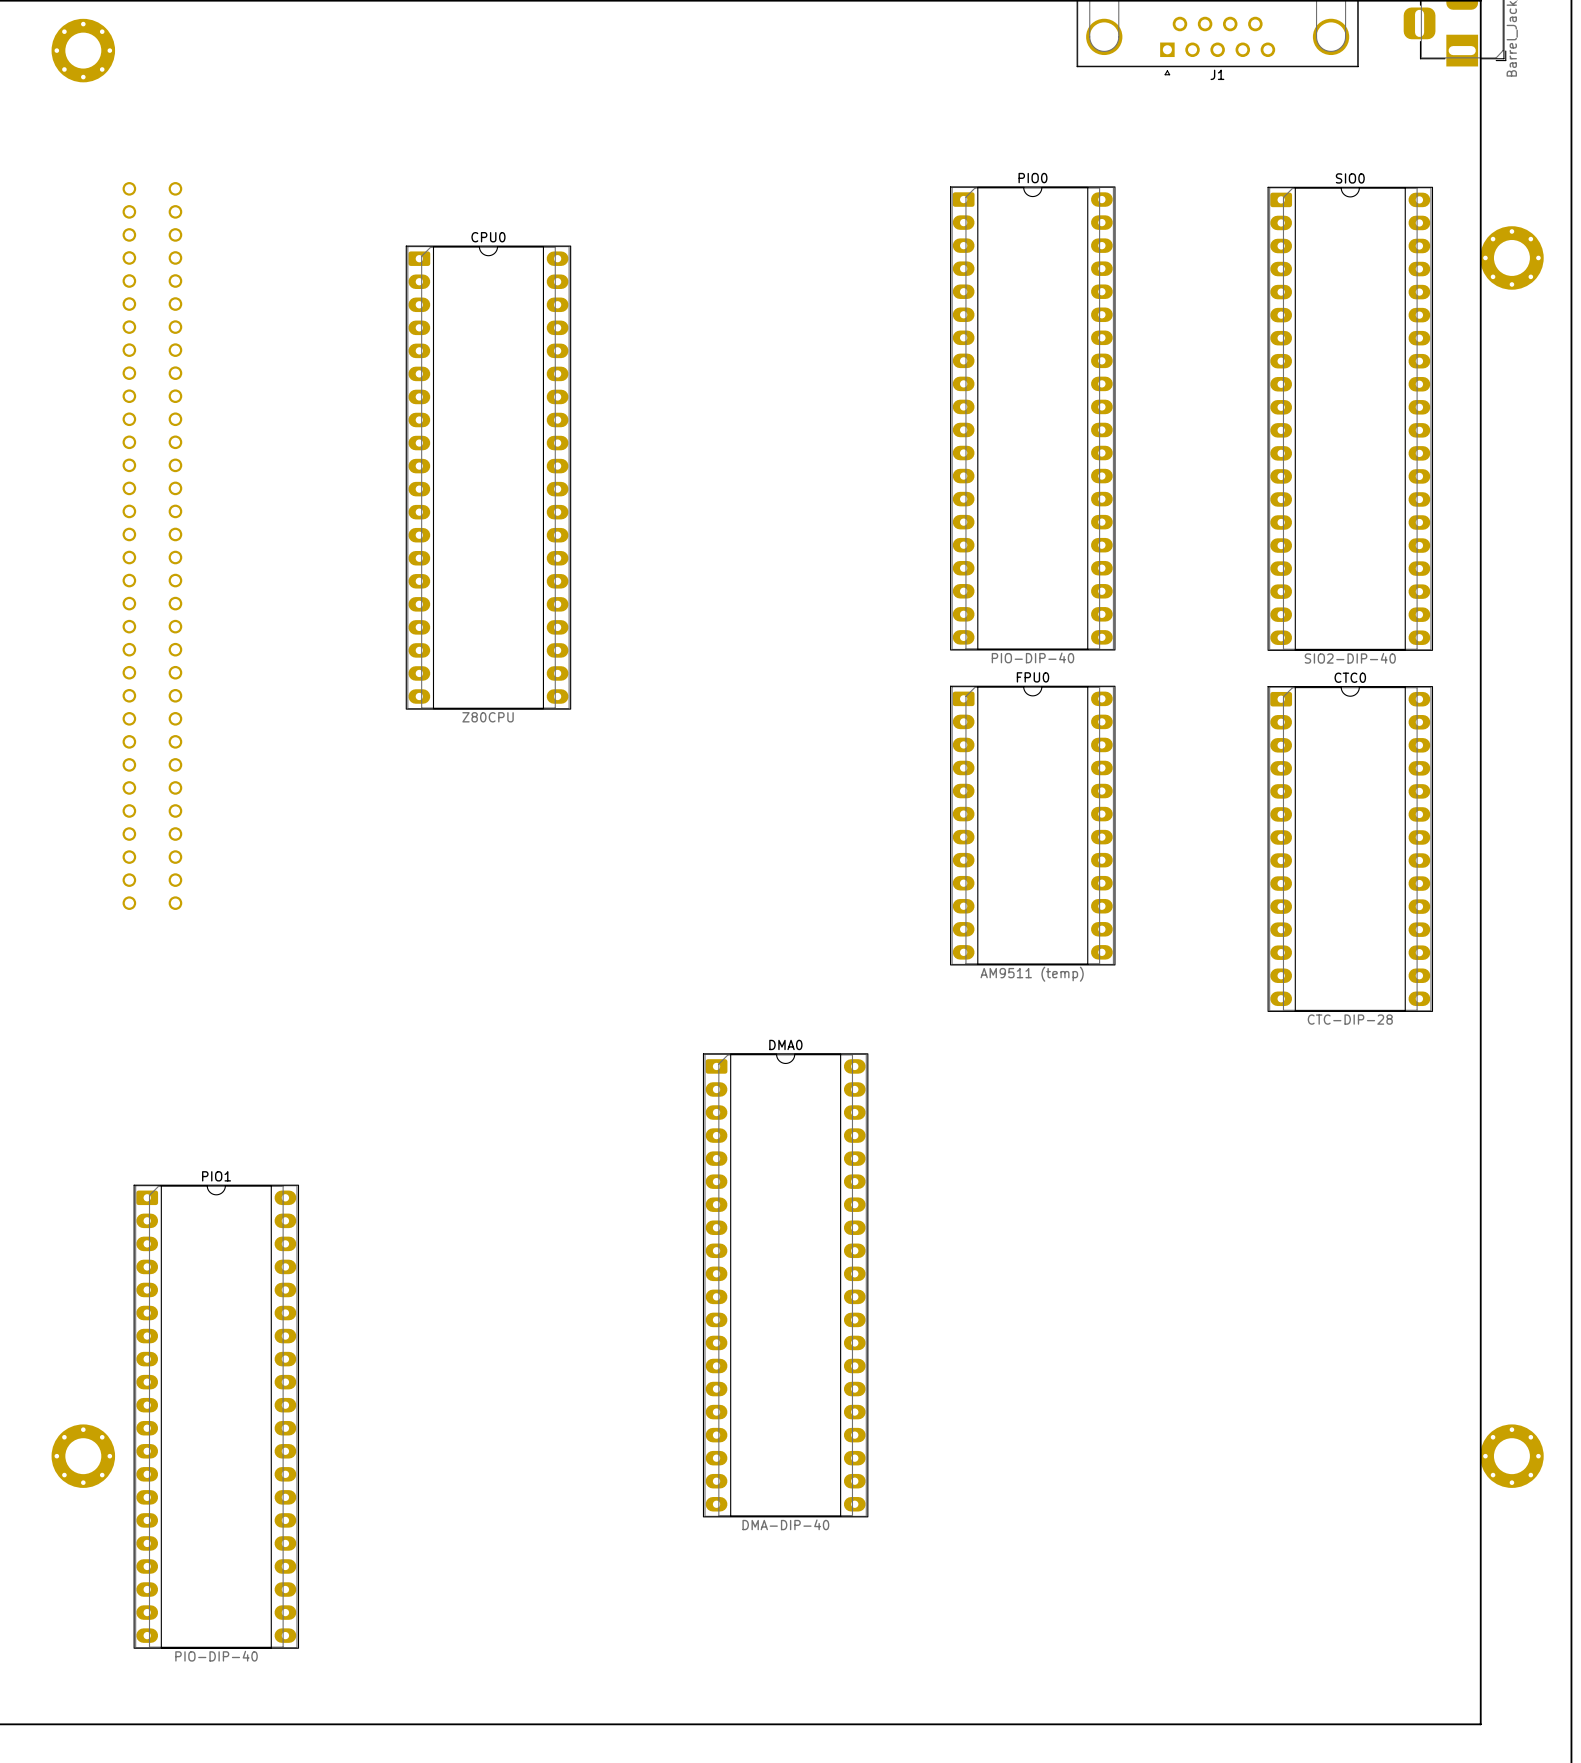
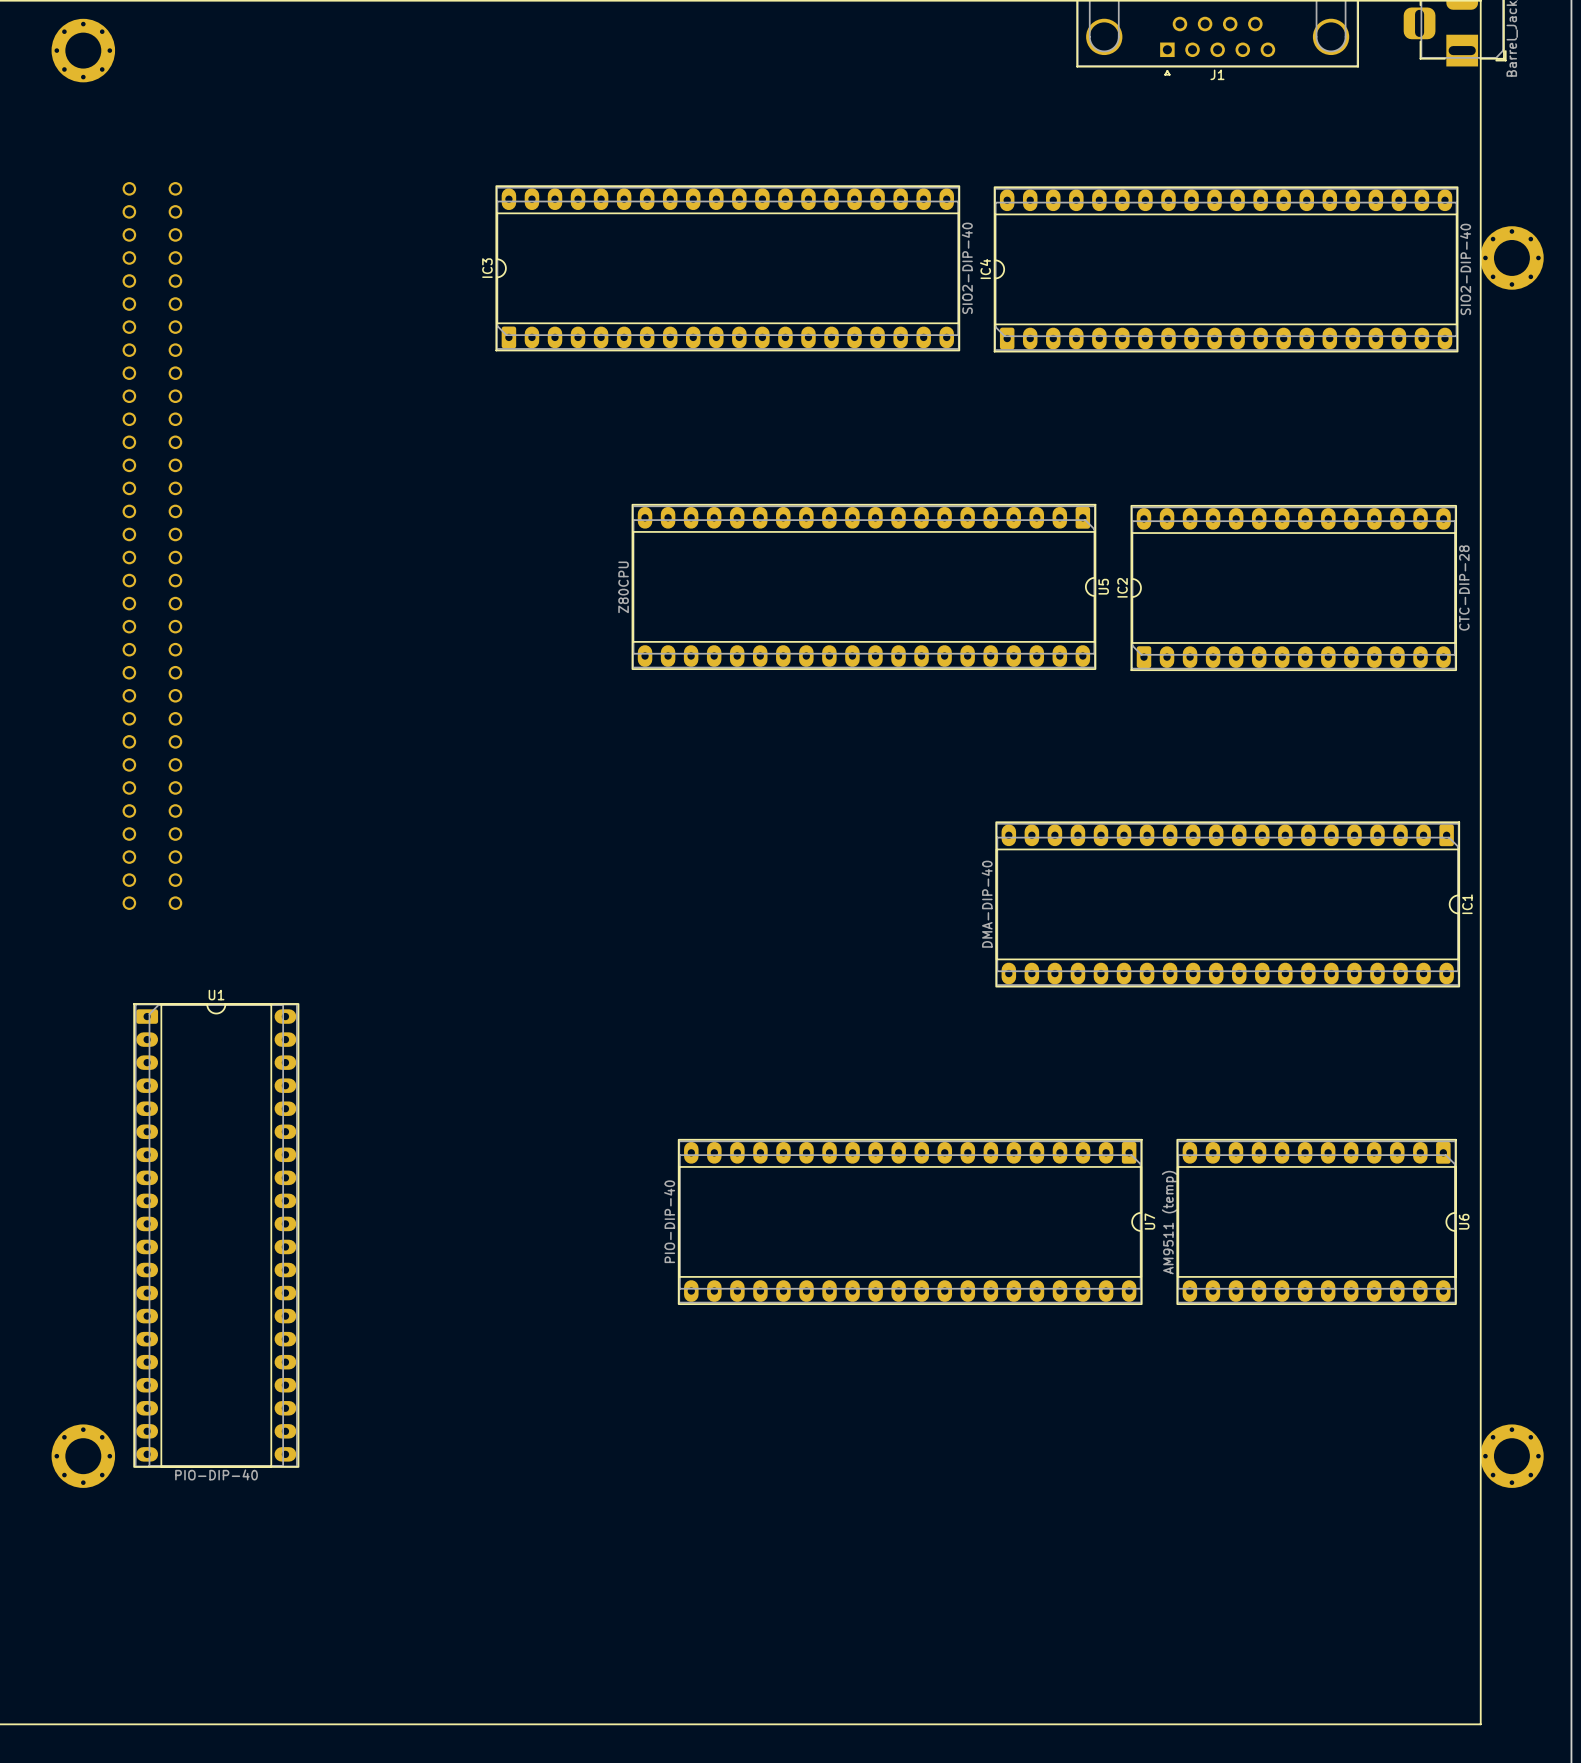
IC3: none -> SIO2-DIP-40 (727, 268)
IC4: none -> SIO2-DIP-40 (1226, 269)
PIO0: PIO-DIP-40 (1032, 418) -> none
SIO0: SIO2-DIP-40 (1350, 418) -> none
CPU0: Z80CPU (488, 477) -> none
U5: none -> Z80CPU (863, 586)
IC2: none -> CTC-DIP-28 (1293, 588)
FPU0: AM9511 (temp) (1032, 825) -> none
CTC0: CTC-DIP-28 (1350, 849) -> none
IC1: none -> DMA-DIP-40 (1227, 904)
U7: none -> PIO-DIP-40 (910, 1221)
U6: none -> AM9511 (temp) (1316, 1221)
U1: none -> PIO-DIP-40 (216, 1235)
DMA0: DMA-DIP-40 (785, 1285) -> none
PIO1: PIO-DIP-40 (216, 1416) -> none

